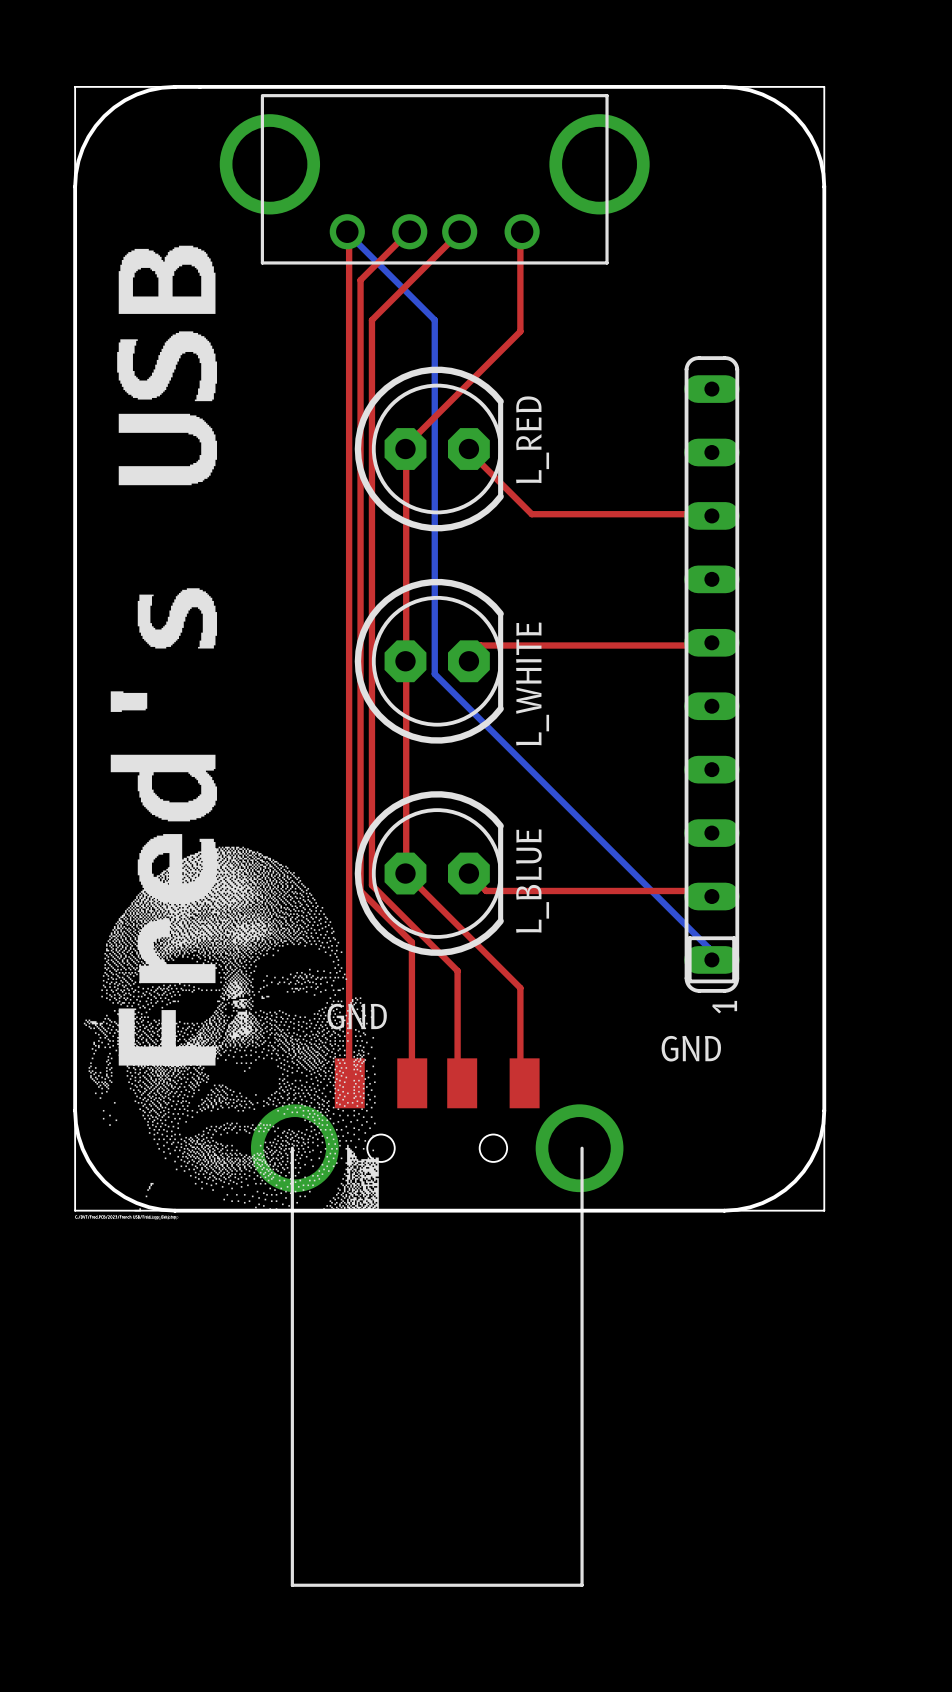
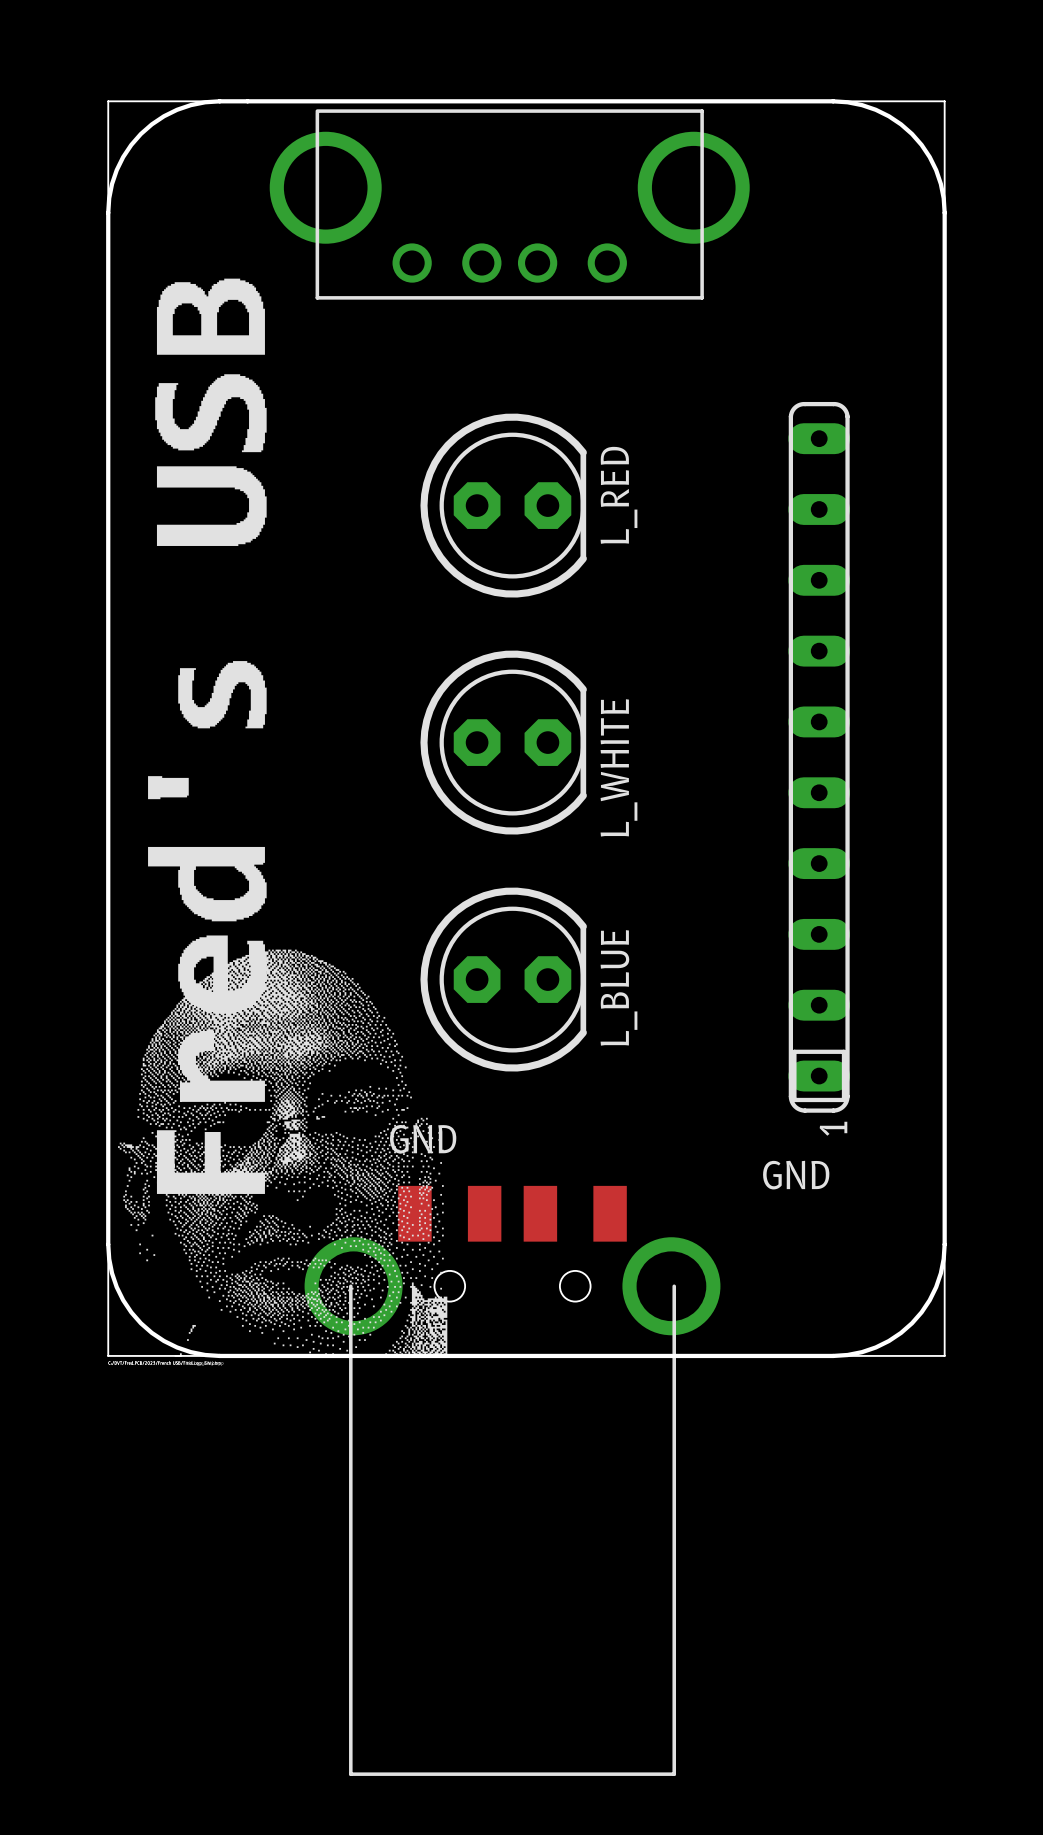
top track: (347, 231) (349, 234) (349, 1083) -> none
bottom track: (347, 231) (434, 320) (434, 674) (708, 948) (708, 959) (711, 959) -> none
top track: (409, 231) (360, 280) (360, 890) (411, 942) (412, 1083) -> none
top track: (459, 231) (371, 320) (371, 885) (457, 970) (457, 1079) (462, 1083) -> none
top track: (522, 231) (520, 234) (520, 331) (406, 445) (405, 449) (405, 873) (520, 988) (520, 1079) (524, 1083) -> none
top track: (468, 449) (469, 451) (531, 514) (708, 514) (711, 515) -> none
top track: (711, 642) (708, 645) (480, 645) (469, 656) (468, 661) -> none
top track: (469, 873) (486, 890) (708, 890) (711, 896) -> none

